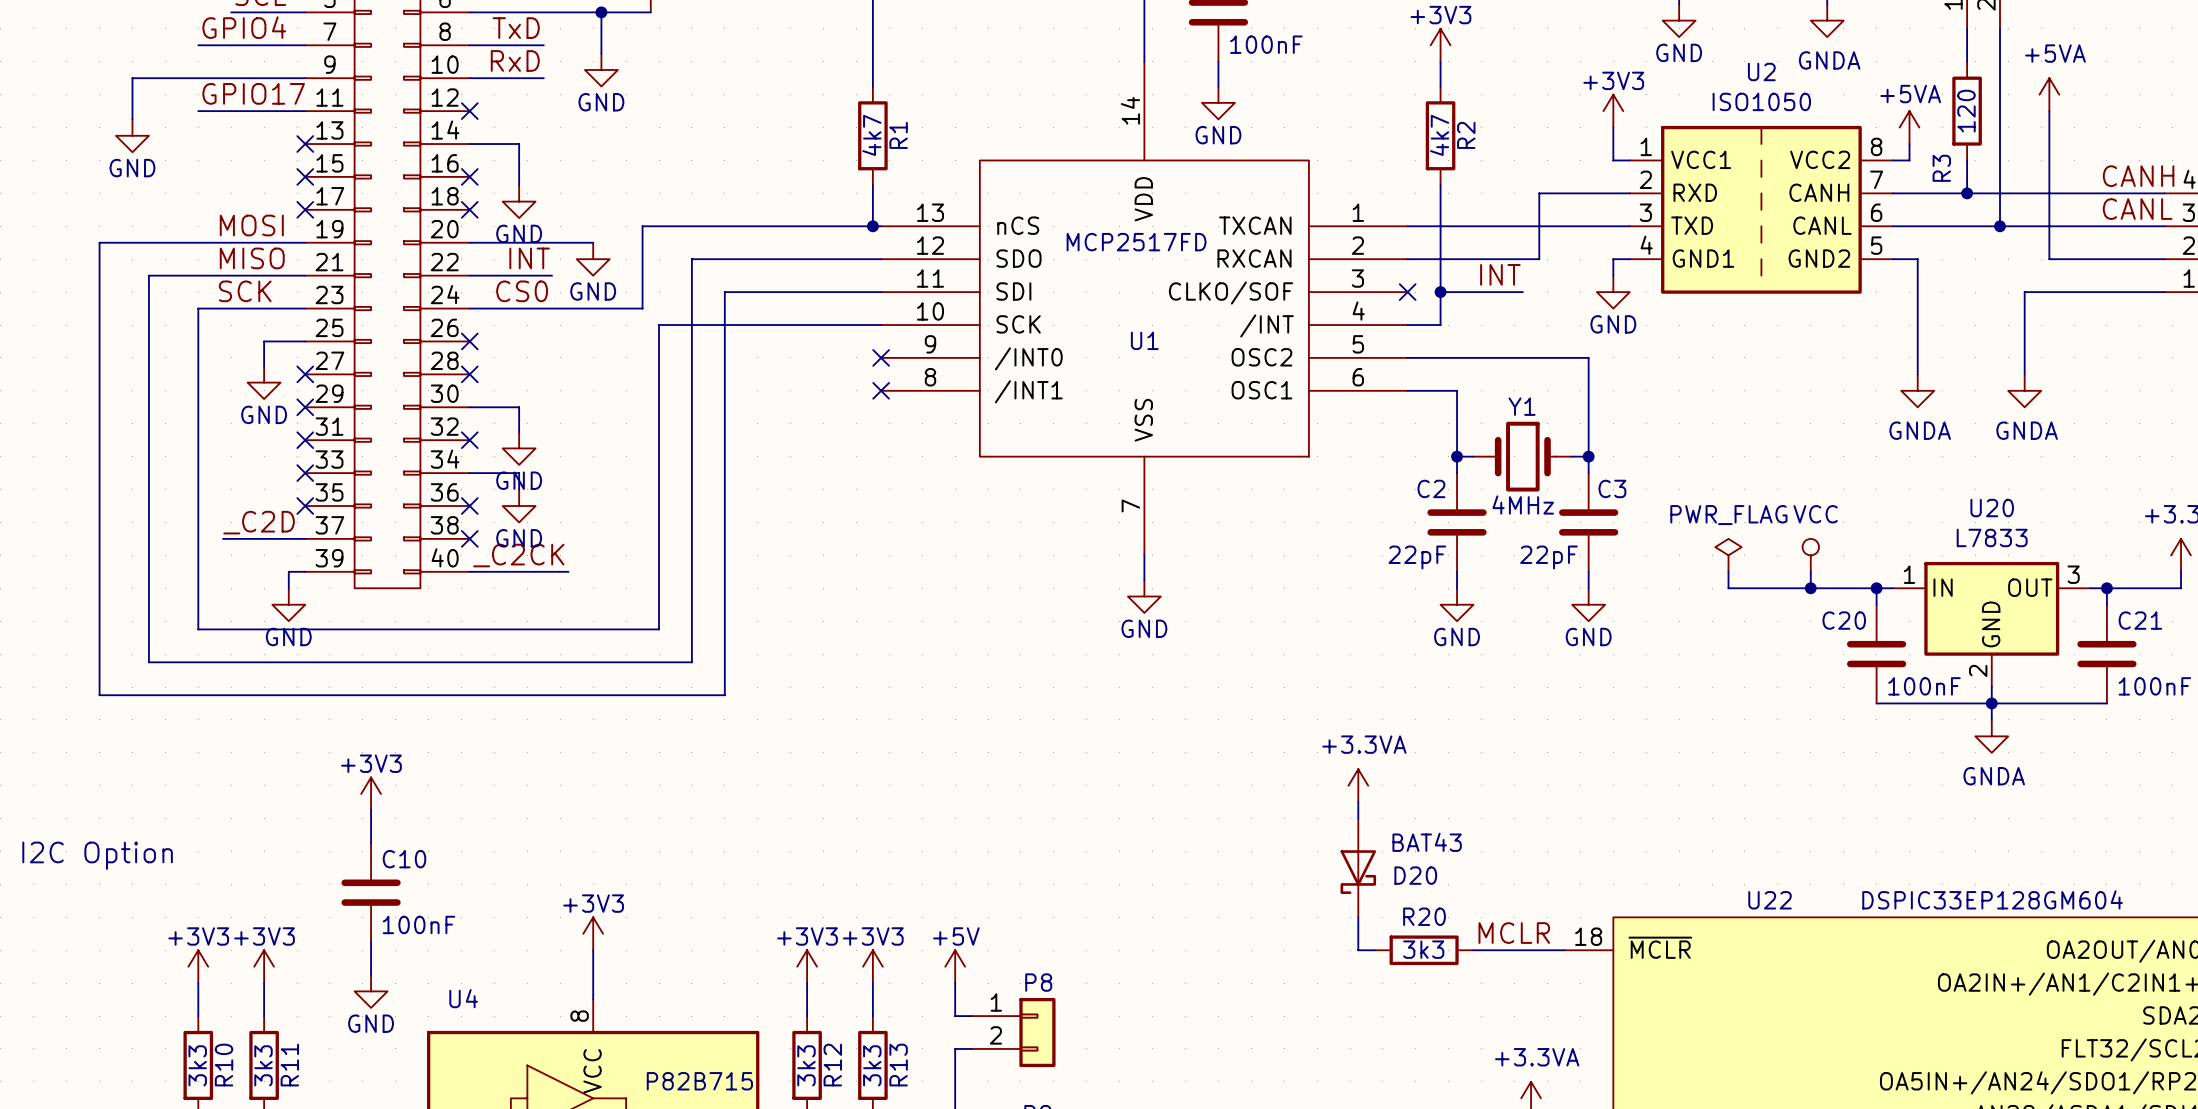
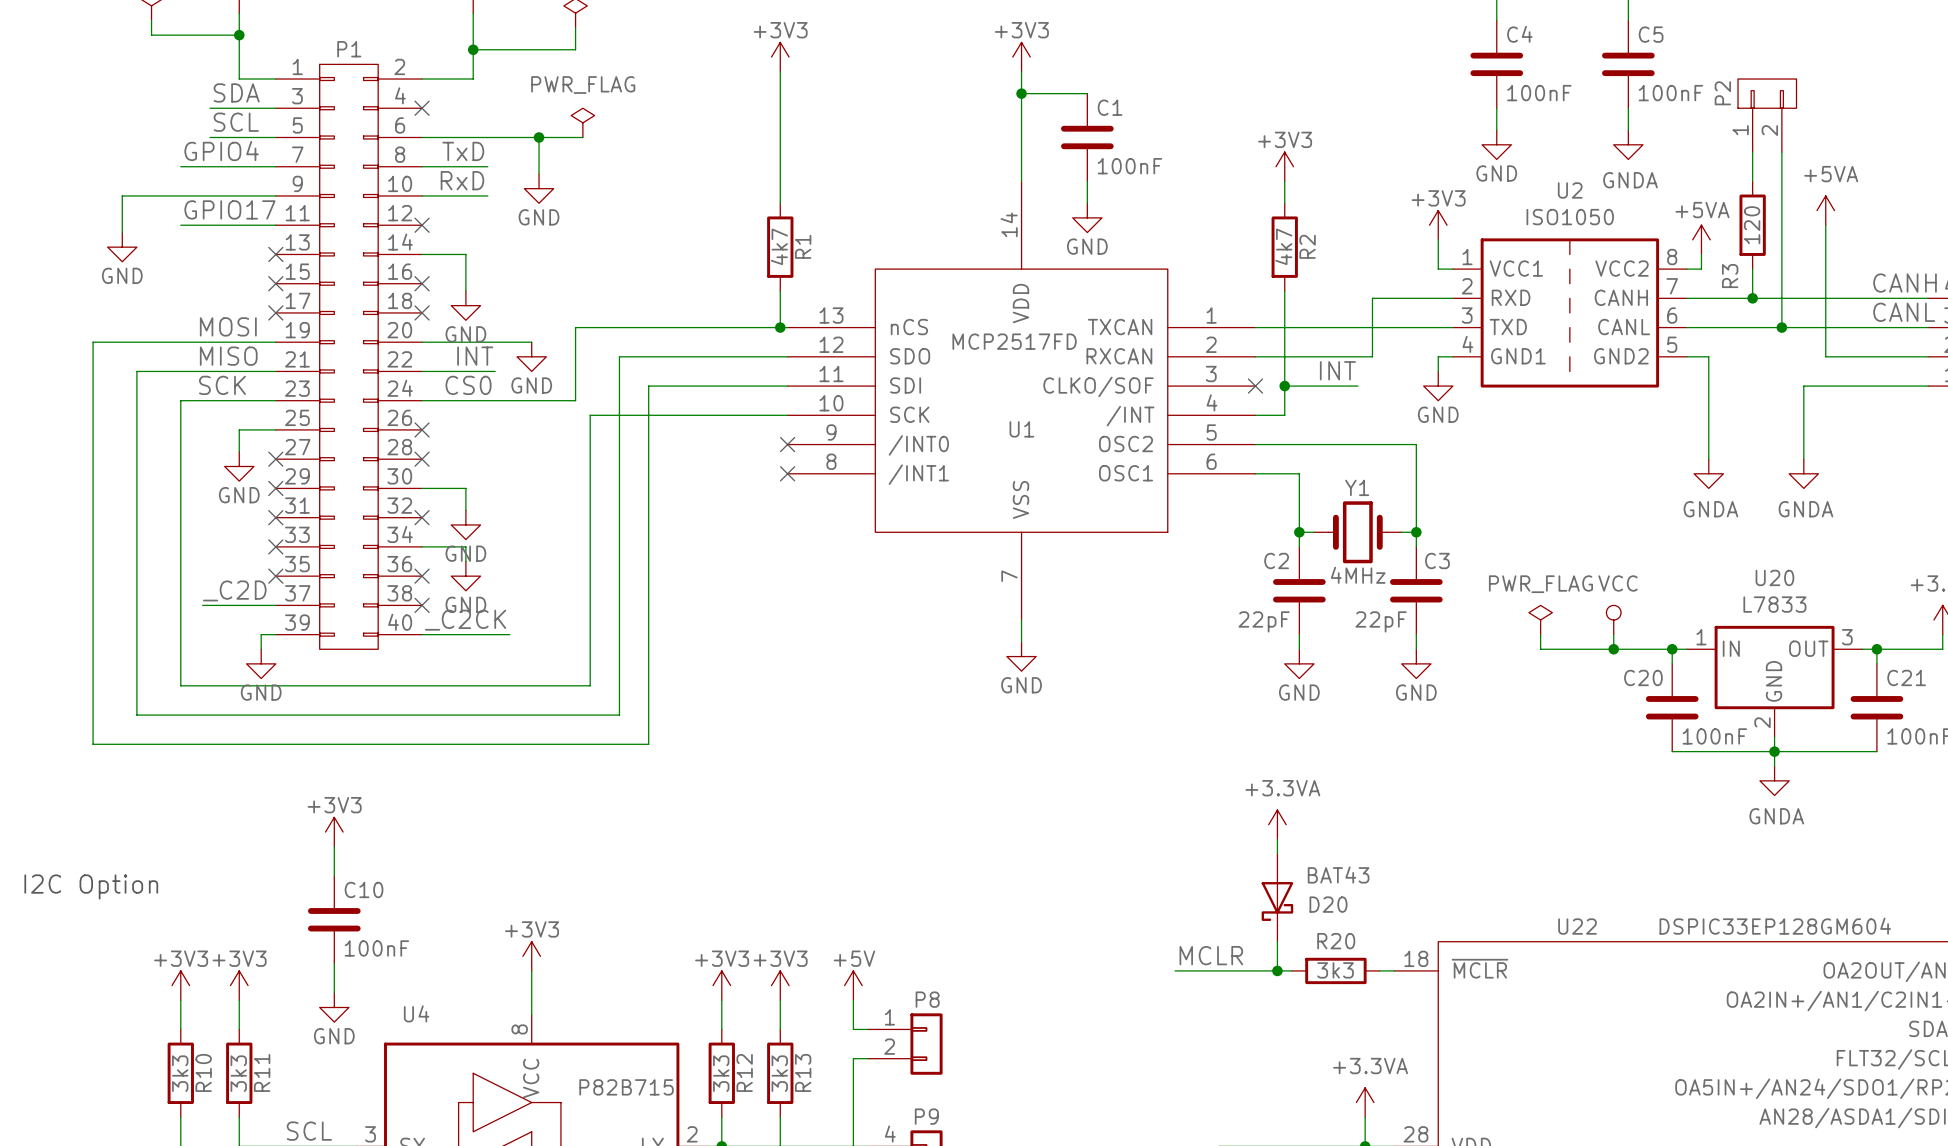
power symbol position: +3.3VA (1358, 785) -> +3.3VA (1277, 824)
wire: (1358, 802) (1358, 818) -> (1277, 839) (1277, 853)
D20 position: (1358, 867) -> (1277, 897)
wire: (1358, 917) (1358, 950) -> (1175, 970) (1211, 970)
wire: none -> (1277, 941) (1277, 970)
label position: MCLR (1514, 933) -> MCLR (1211, 955)
R20 position: (1424, 950) -> (1335, 970)
junction: none -> (1277, 970)
wire: (1473, 950) (1547, 950) -> (1226, 970) (1292, 970)

